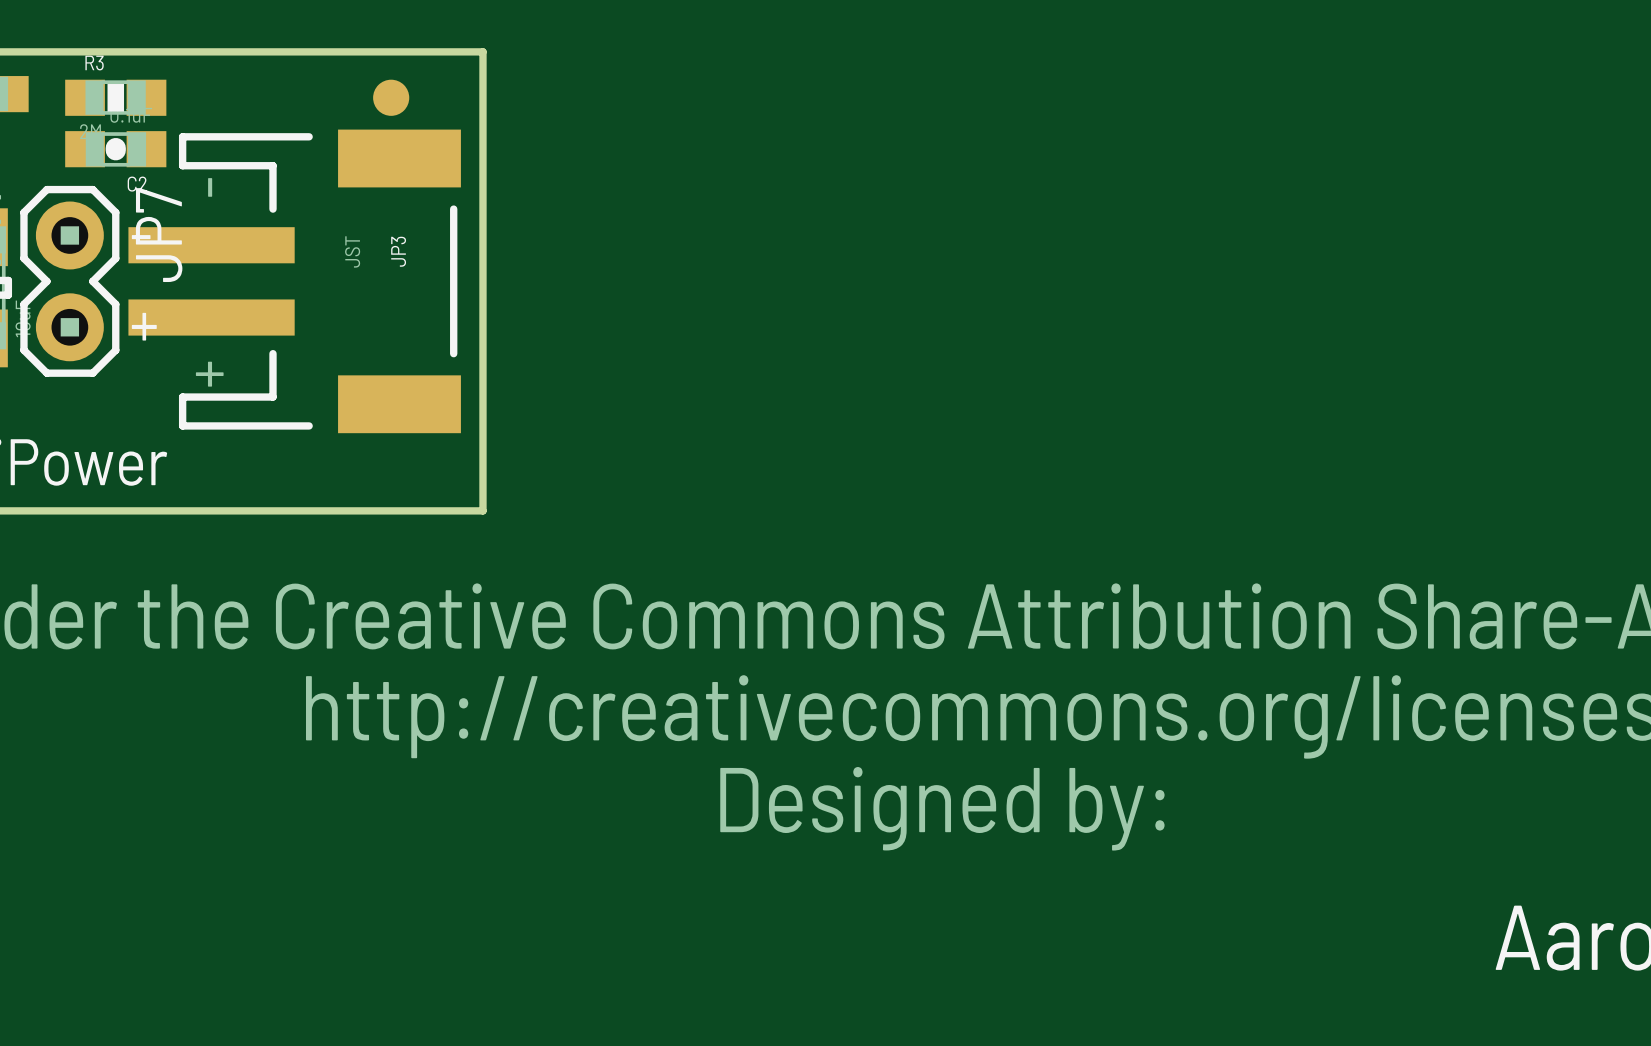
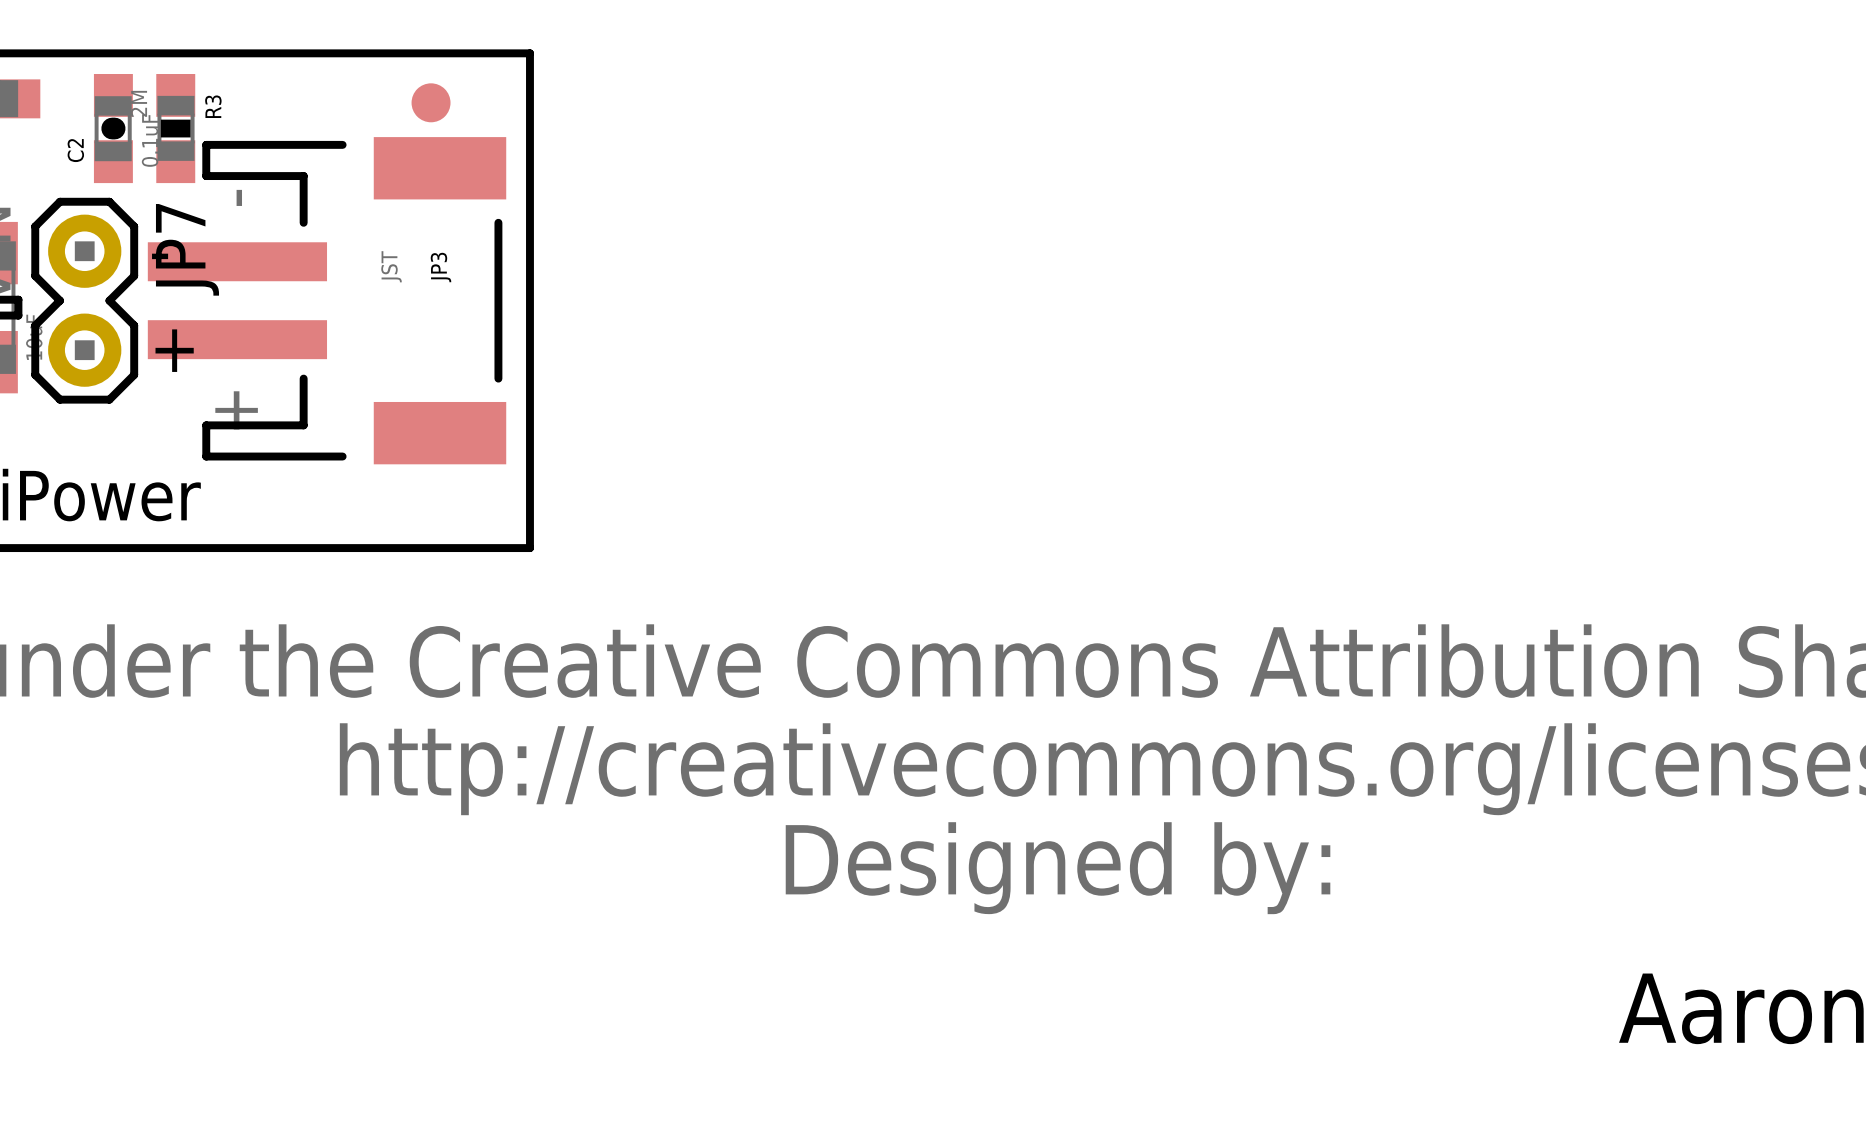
R3 rotation: 0° (115, 97) -> 90° clockwise (175, 128)
C2 rotation: 0° (115, 149) -> 90° clockwise (113, 128)

